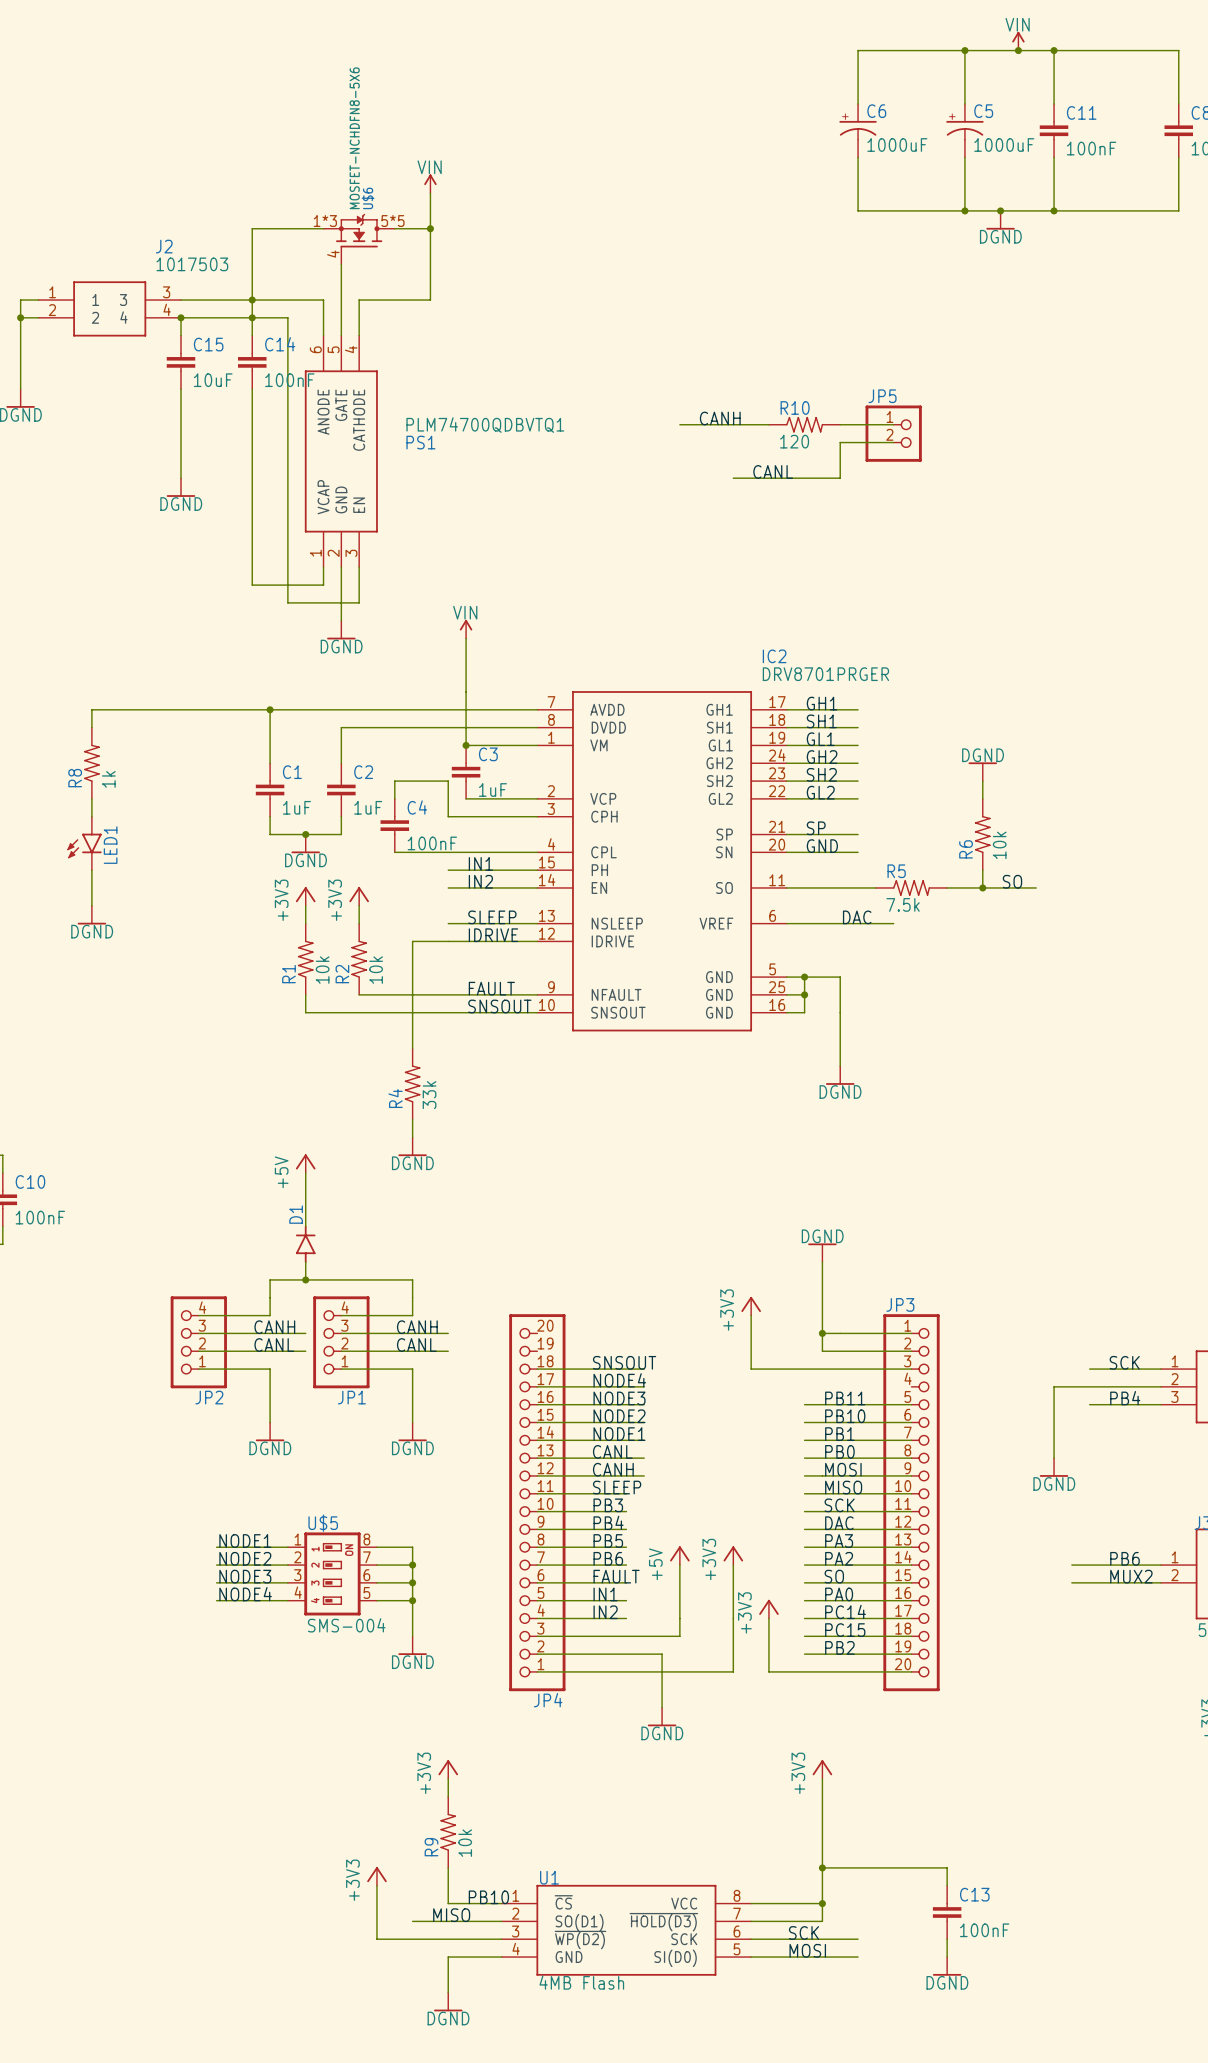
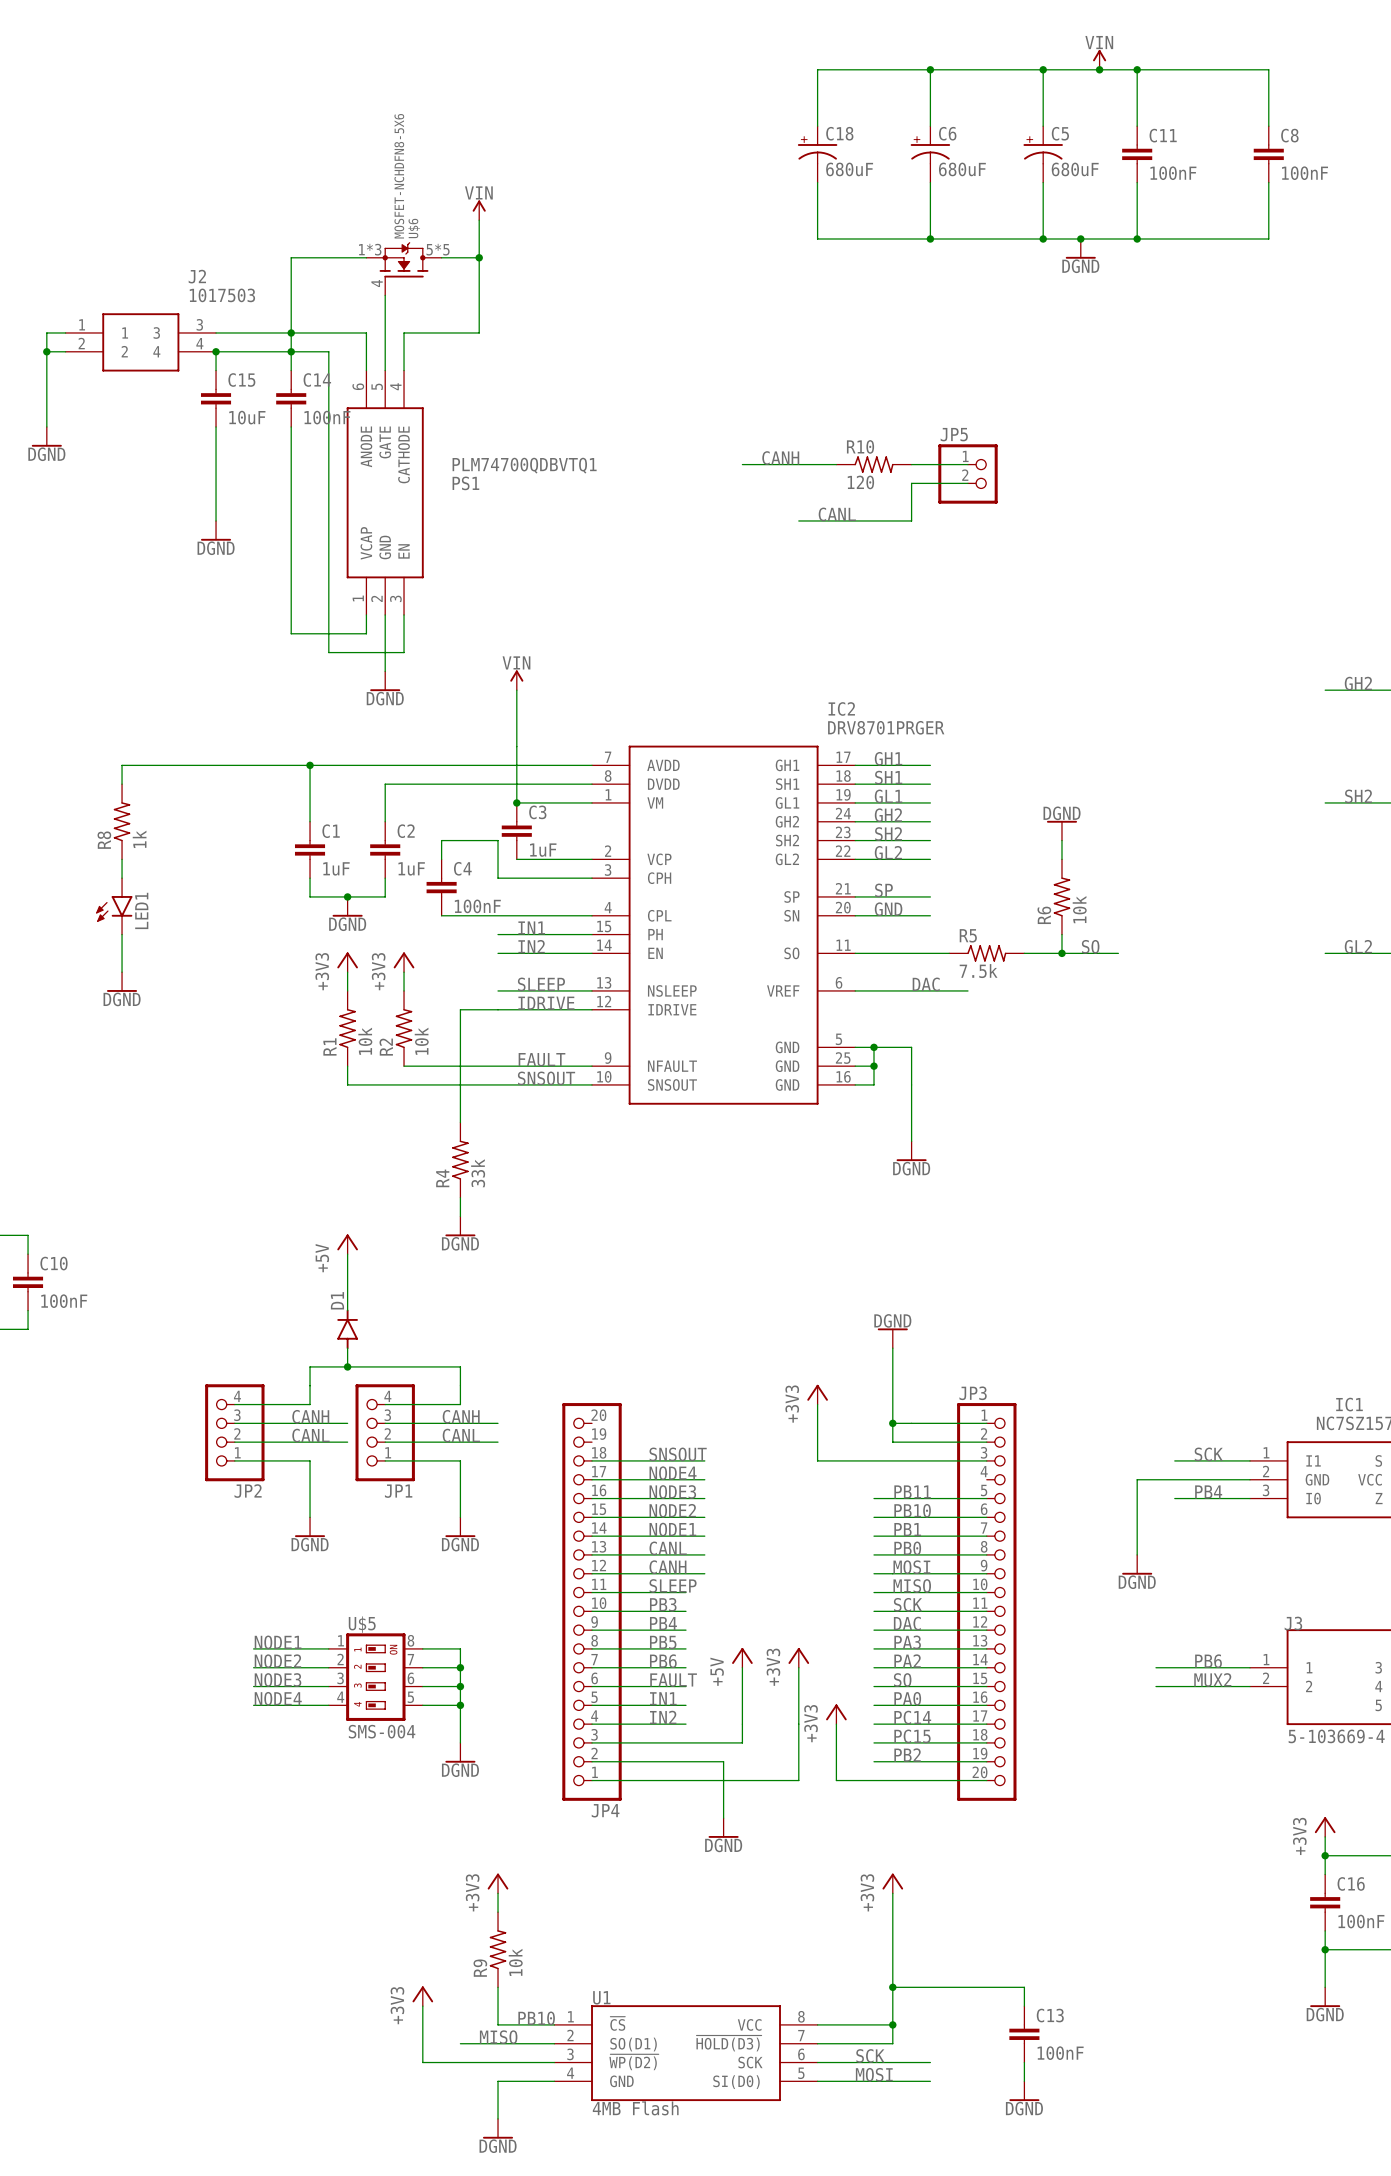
wire: none -> (930, 69) (817, 69) (817, 126)
junction: none -> (930, 69)
C18: none -> 680uF (817, 154)
C6 value: 1000uF (897, 145) -> 680uF (962, 169)
C5 value: 1000uF (1004, 145) -> 680uF (1075, 169)
wire: none -> (817, 182) (817, 238) (930, 238)
junction: none -> (930, 238)

